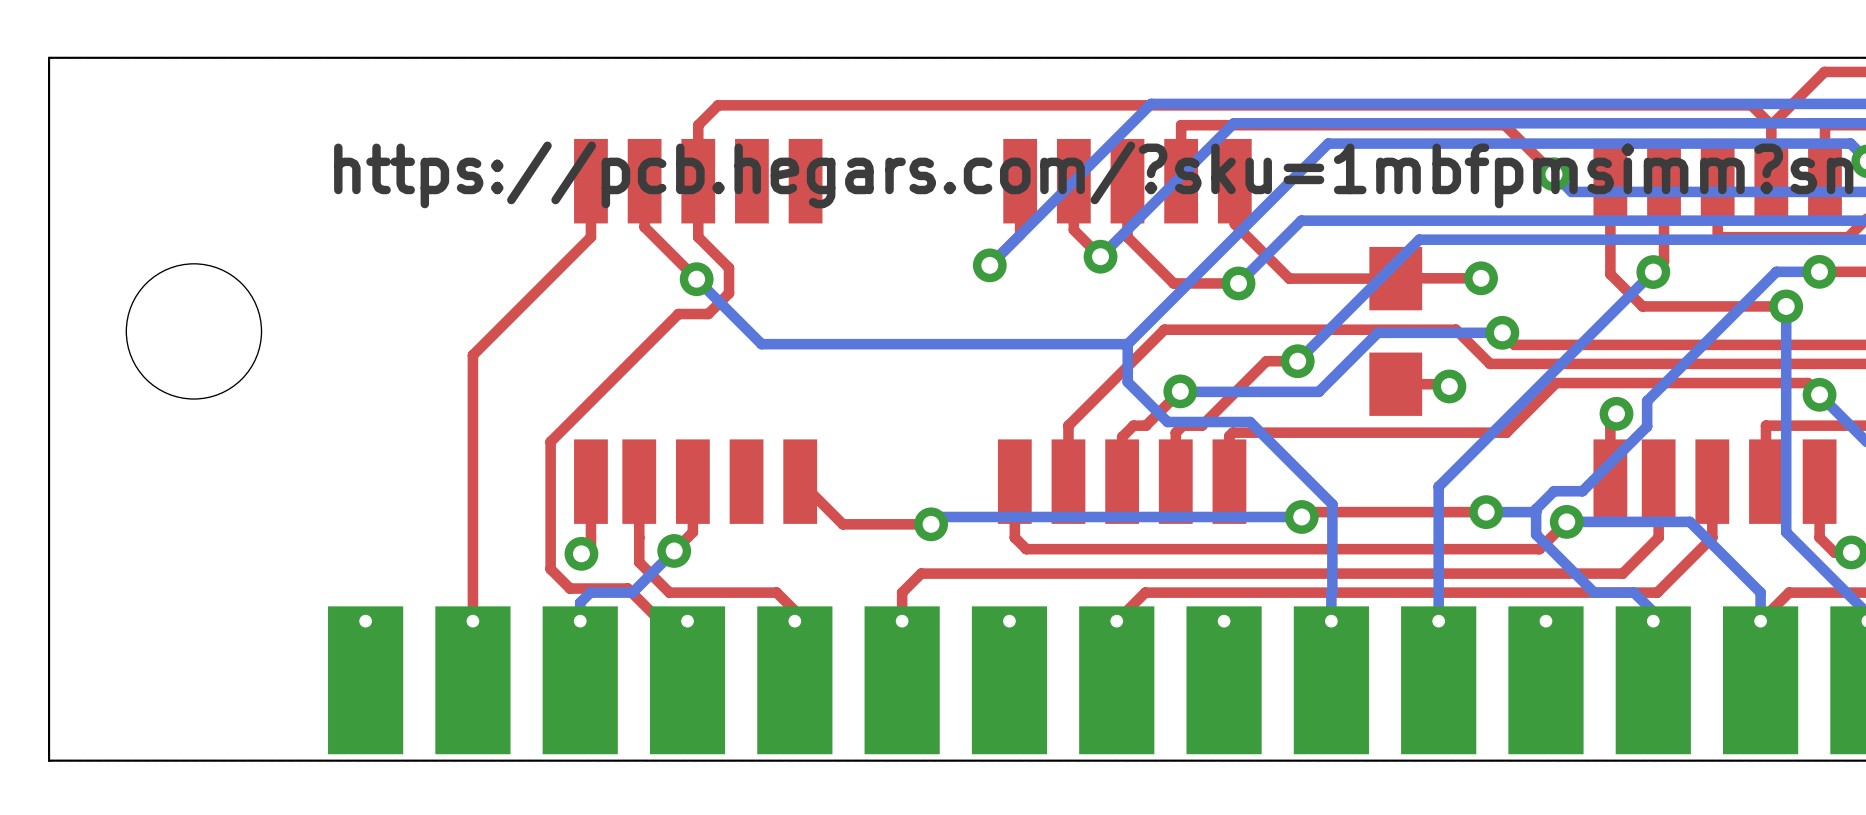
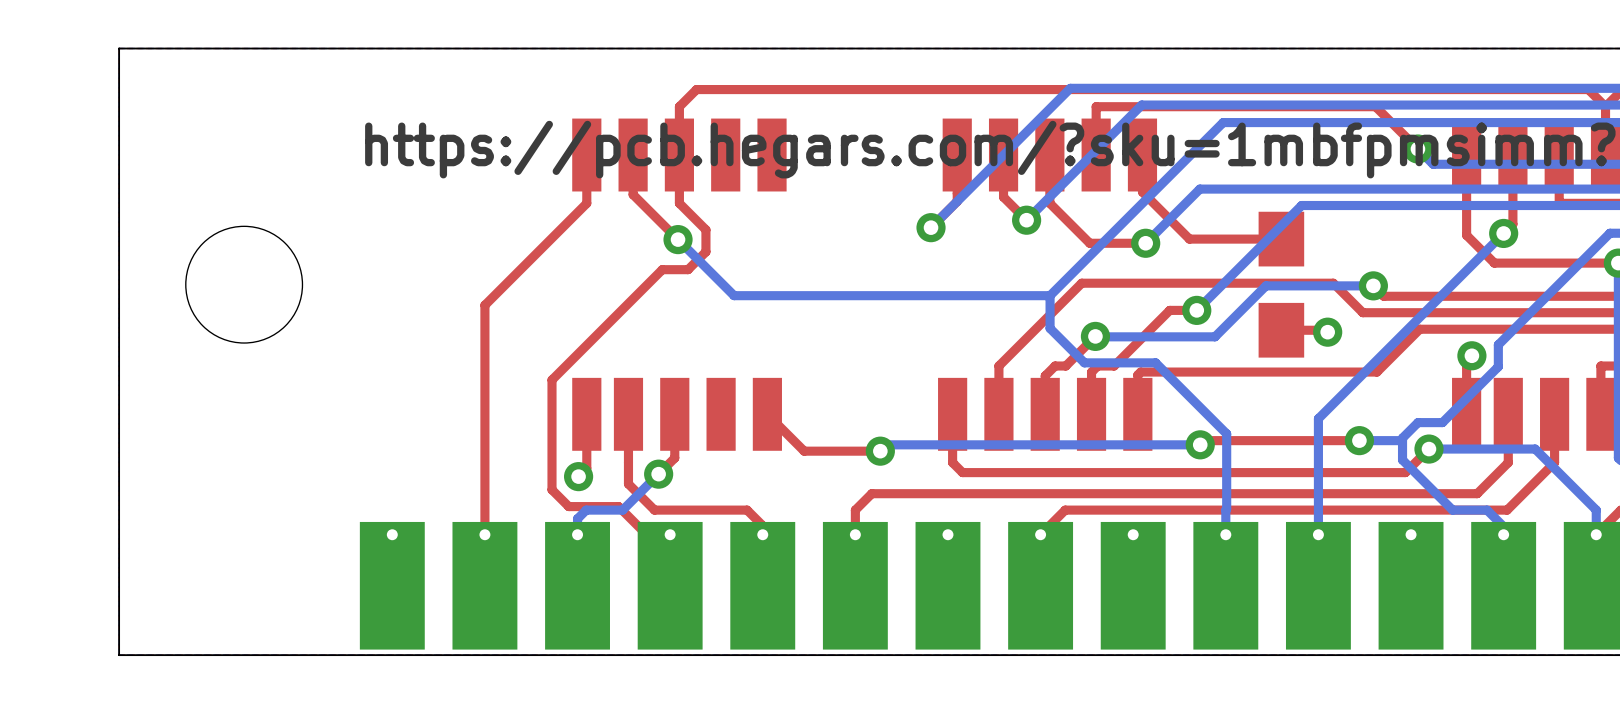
top track: (1481, 278) (1396, 278) -> none
via: (1481, 278) -> none

